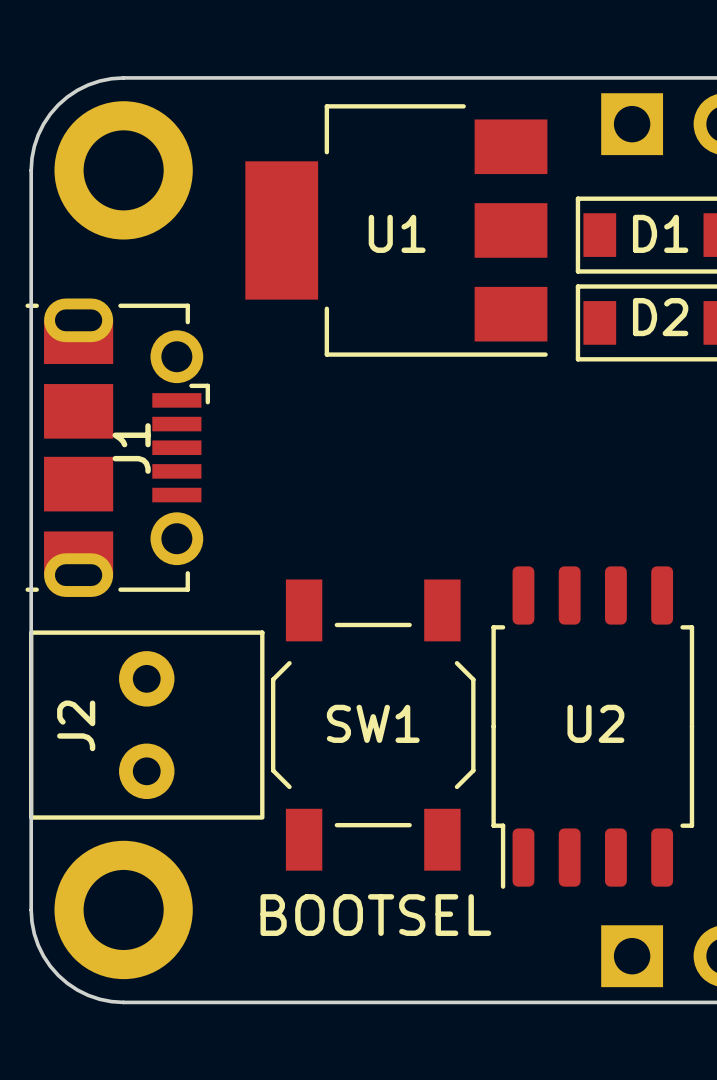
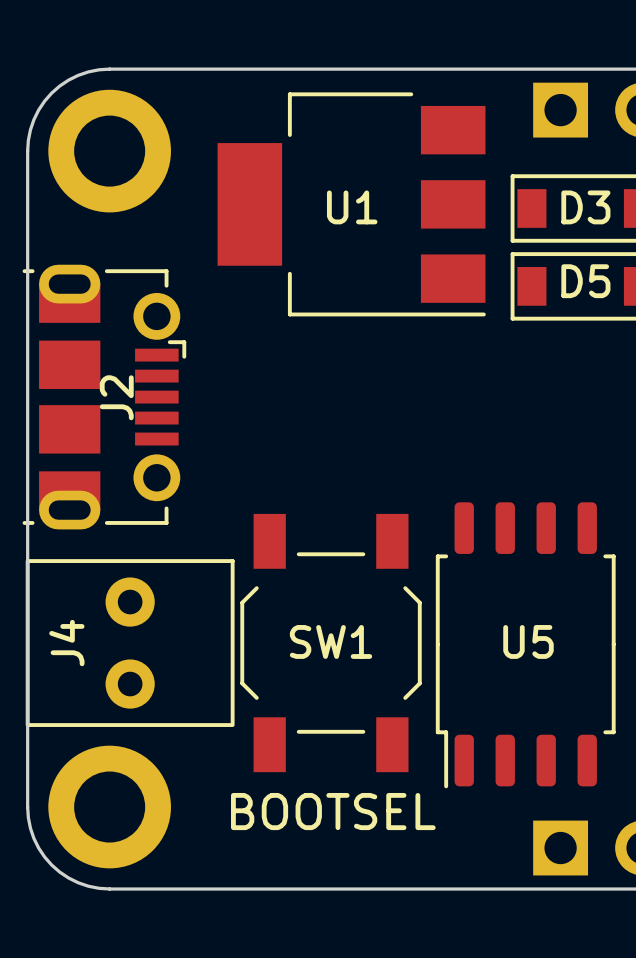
D1 name: D1 (660, 233) -> D3 (585, 207)
D2 name: D2 (660, 317) -> D5 (585, 281)
J1 name: J1 (131, 448) -> J2 (116, 397)
U2 name: U2 (595, 723) -> U5 (528, 641)
J2 name: J2 (76, 725) -> J4 (66, 643)

